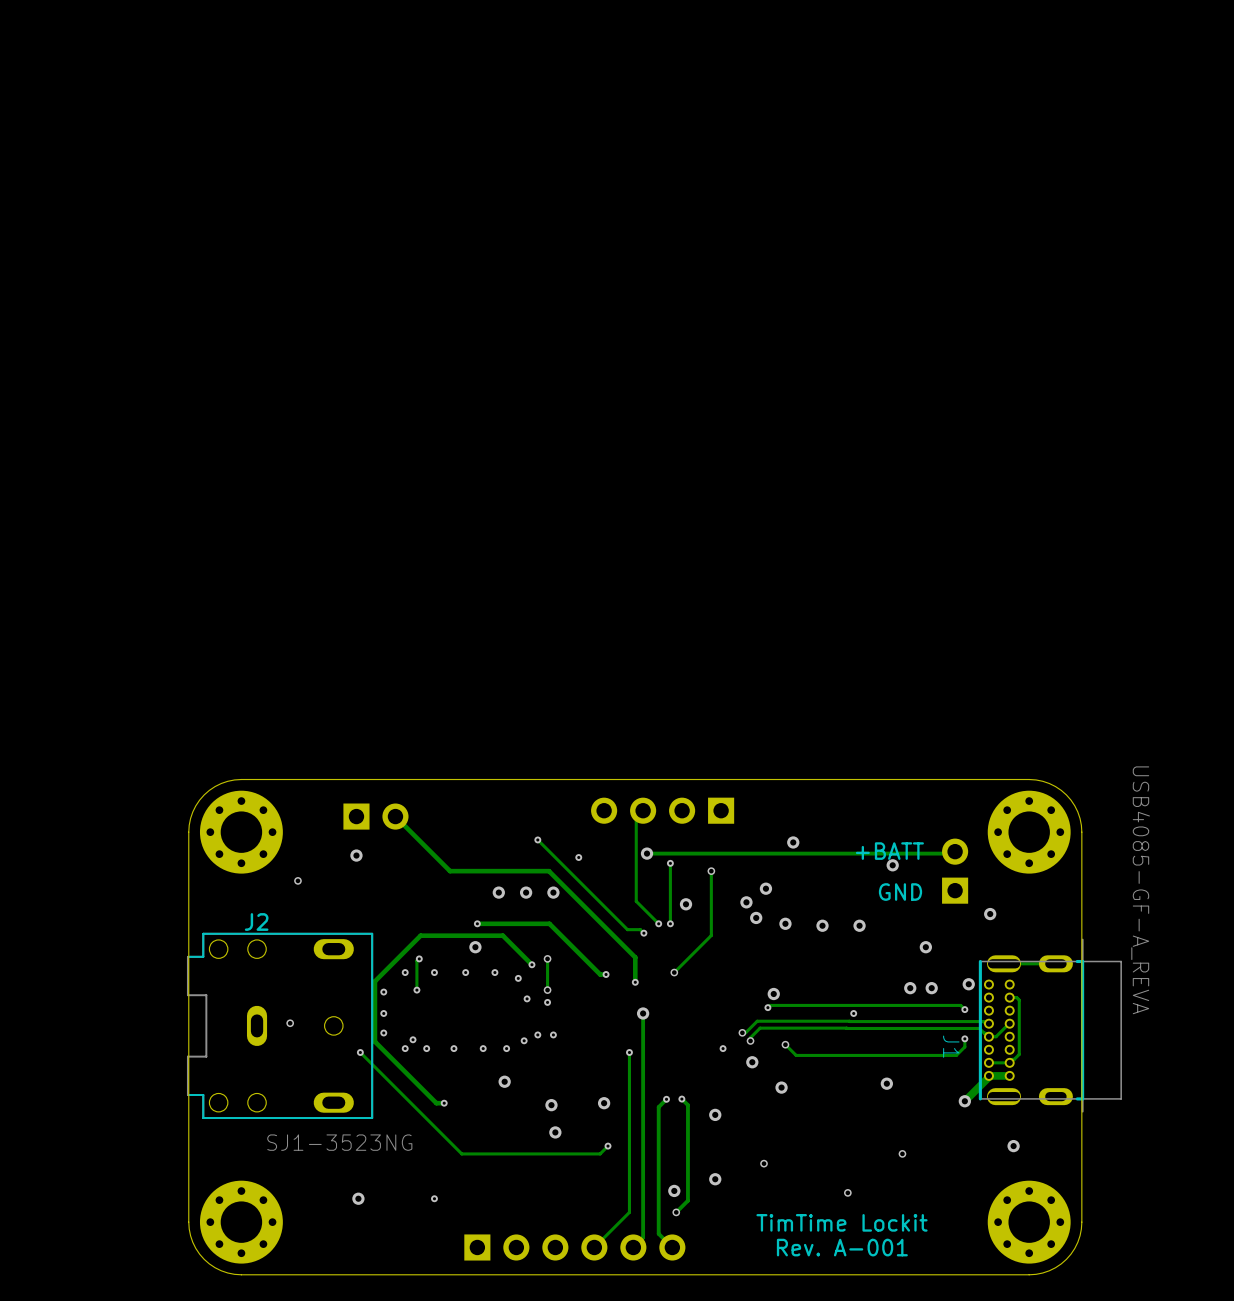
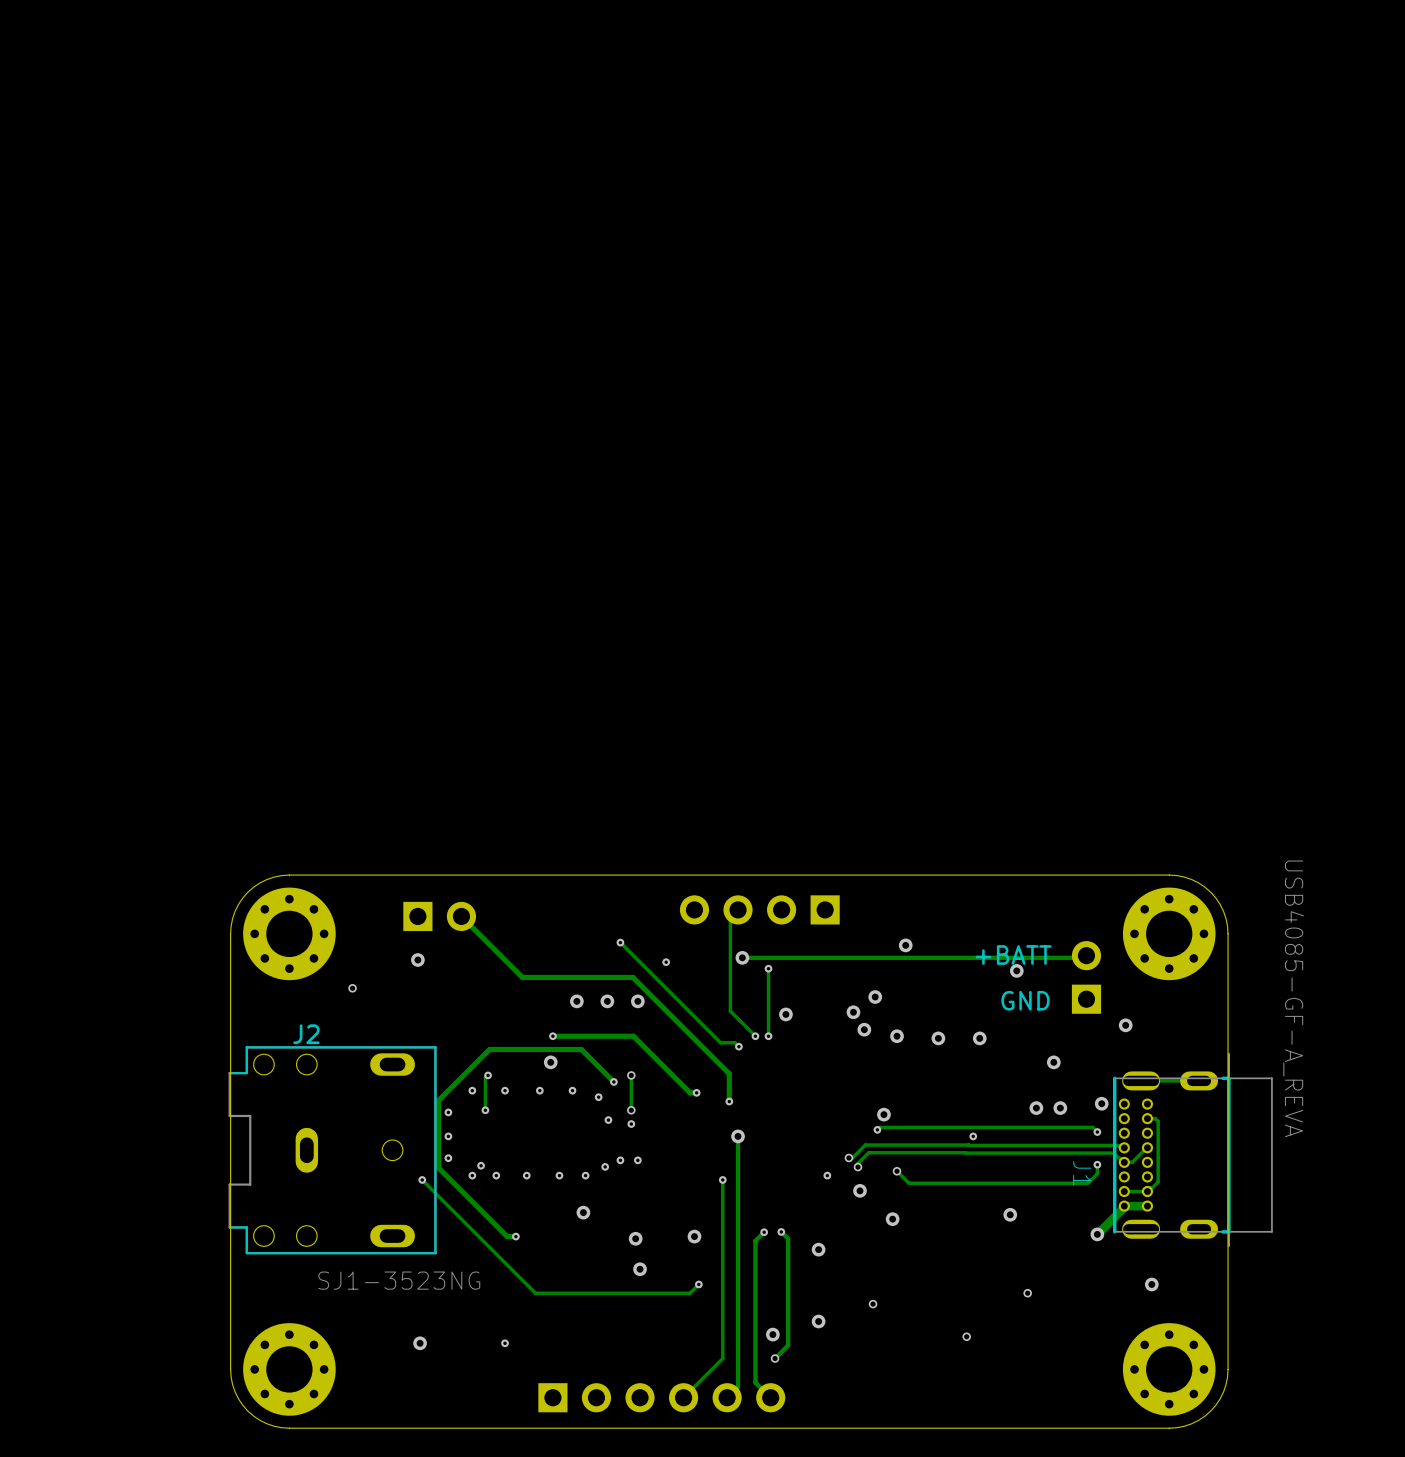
track: (711, 871) (711, 935) (674, 972) -> none
via: (711, 871) -> none
via: (674, 972) -> none
via: (290, 1023) -> none
text: TimTime Lockit (842, 1222) -> none
text: Rev. A-001 (842, 1247) -> none

